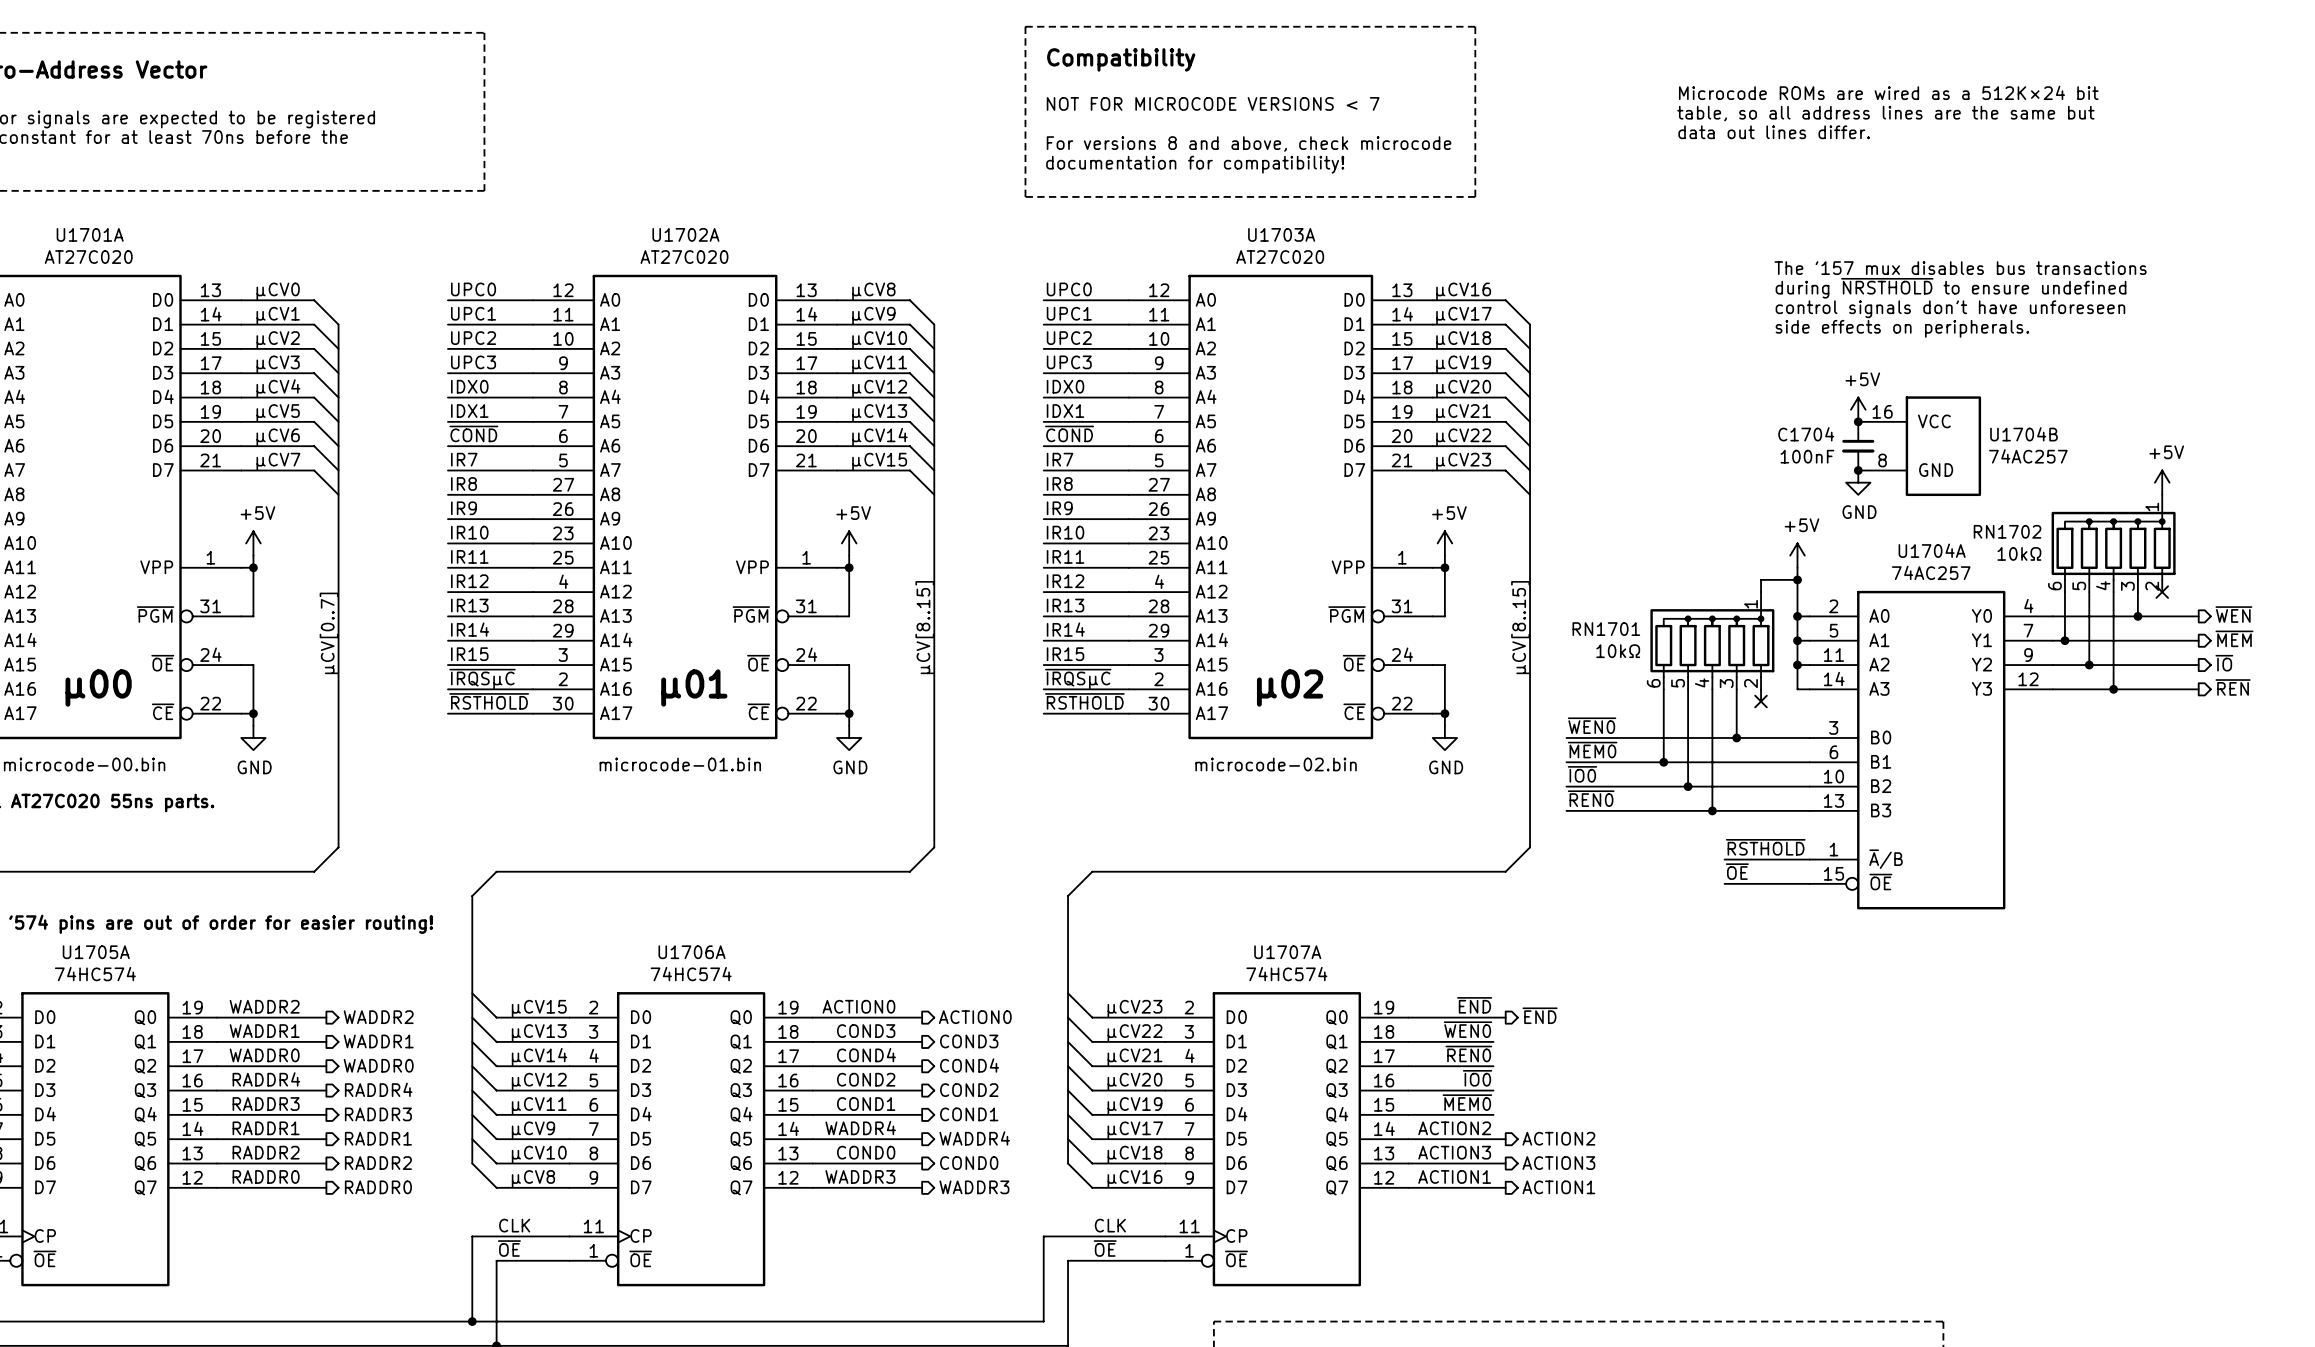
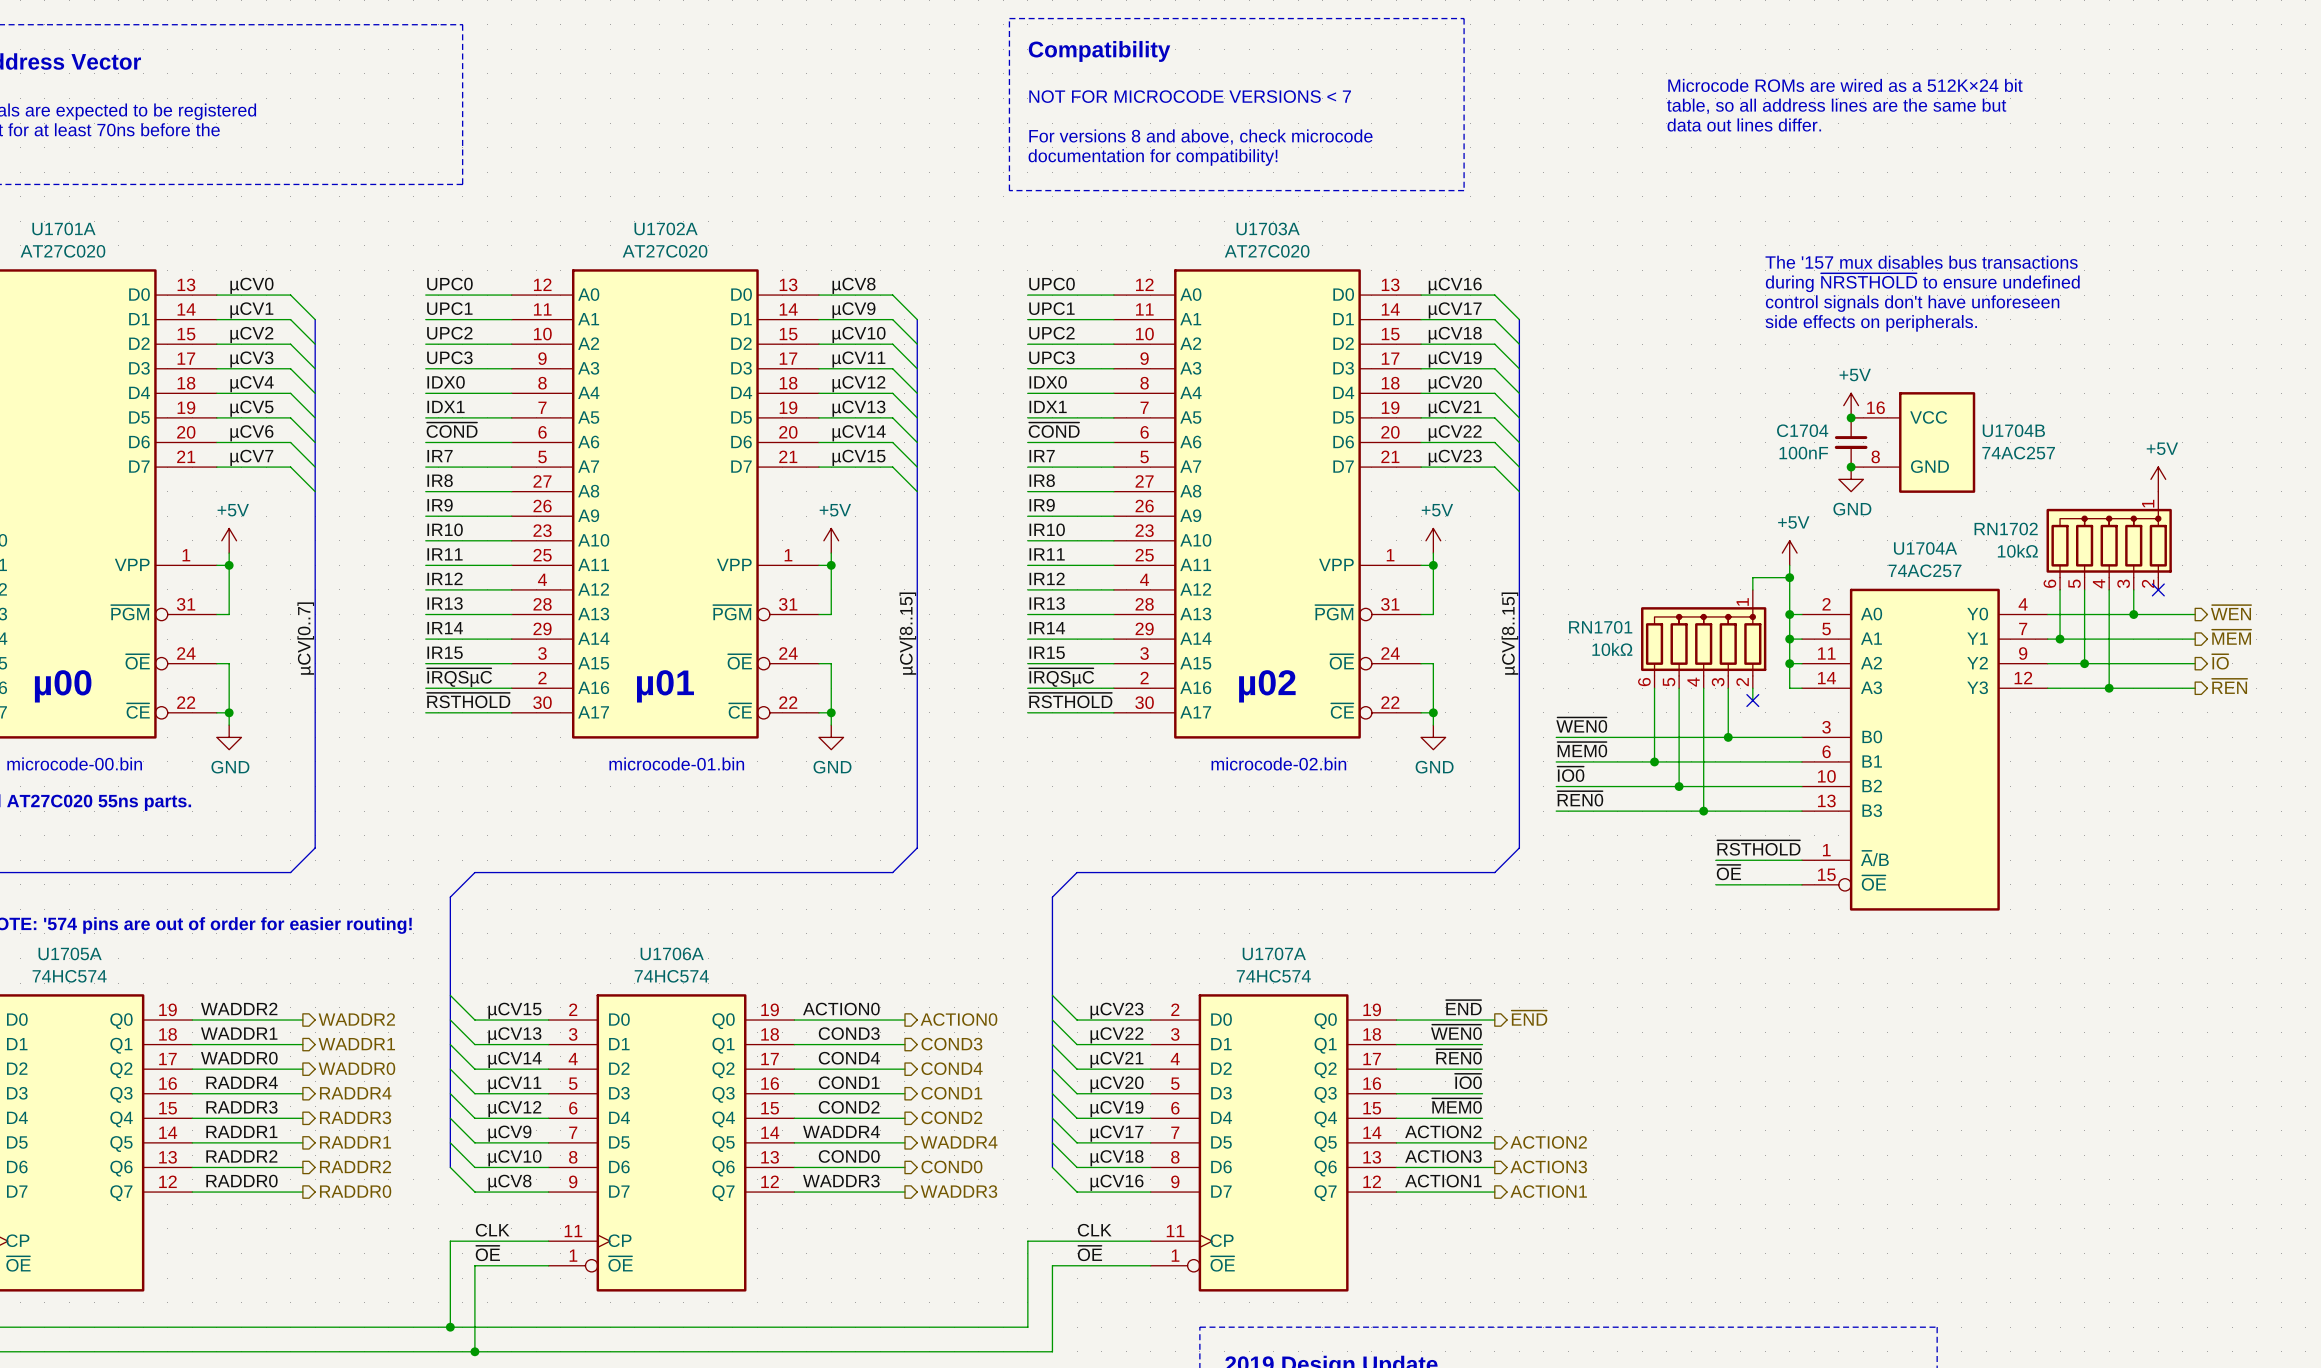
label: COND2 (866, 1079) -> COND1 (849, 1082)
label: µCV12 (539, 1081) -> µCV11 (514, 1084)
hierarchical label: COND2 (969, 1090) -> COND1 (951, 1093)
label: COND1 (866, 1104) -> COND2 (849, 1107)
label: µCV11 (539, 1106) -> µCV12 (514, 1109)
hierarchical label: COND1 (969, 1114) -> COND2 (951, 1117)

